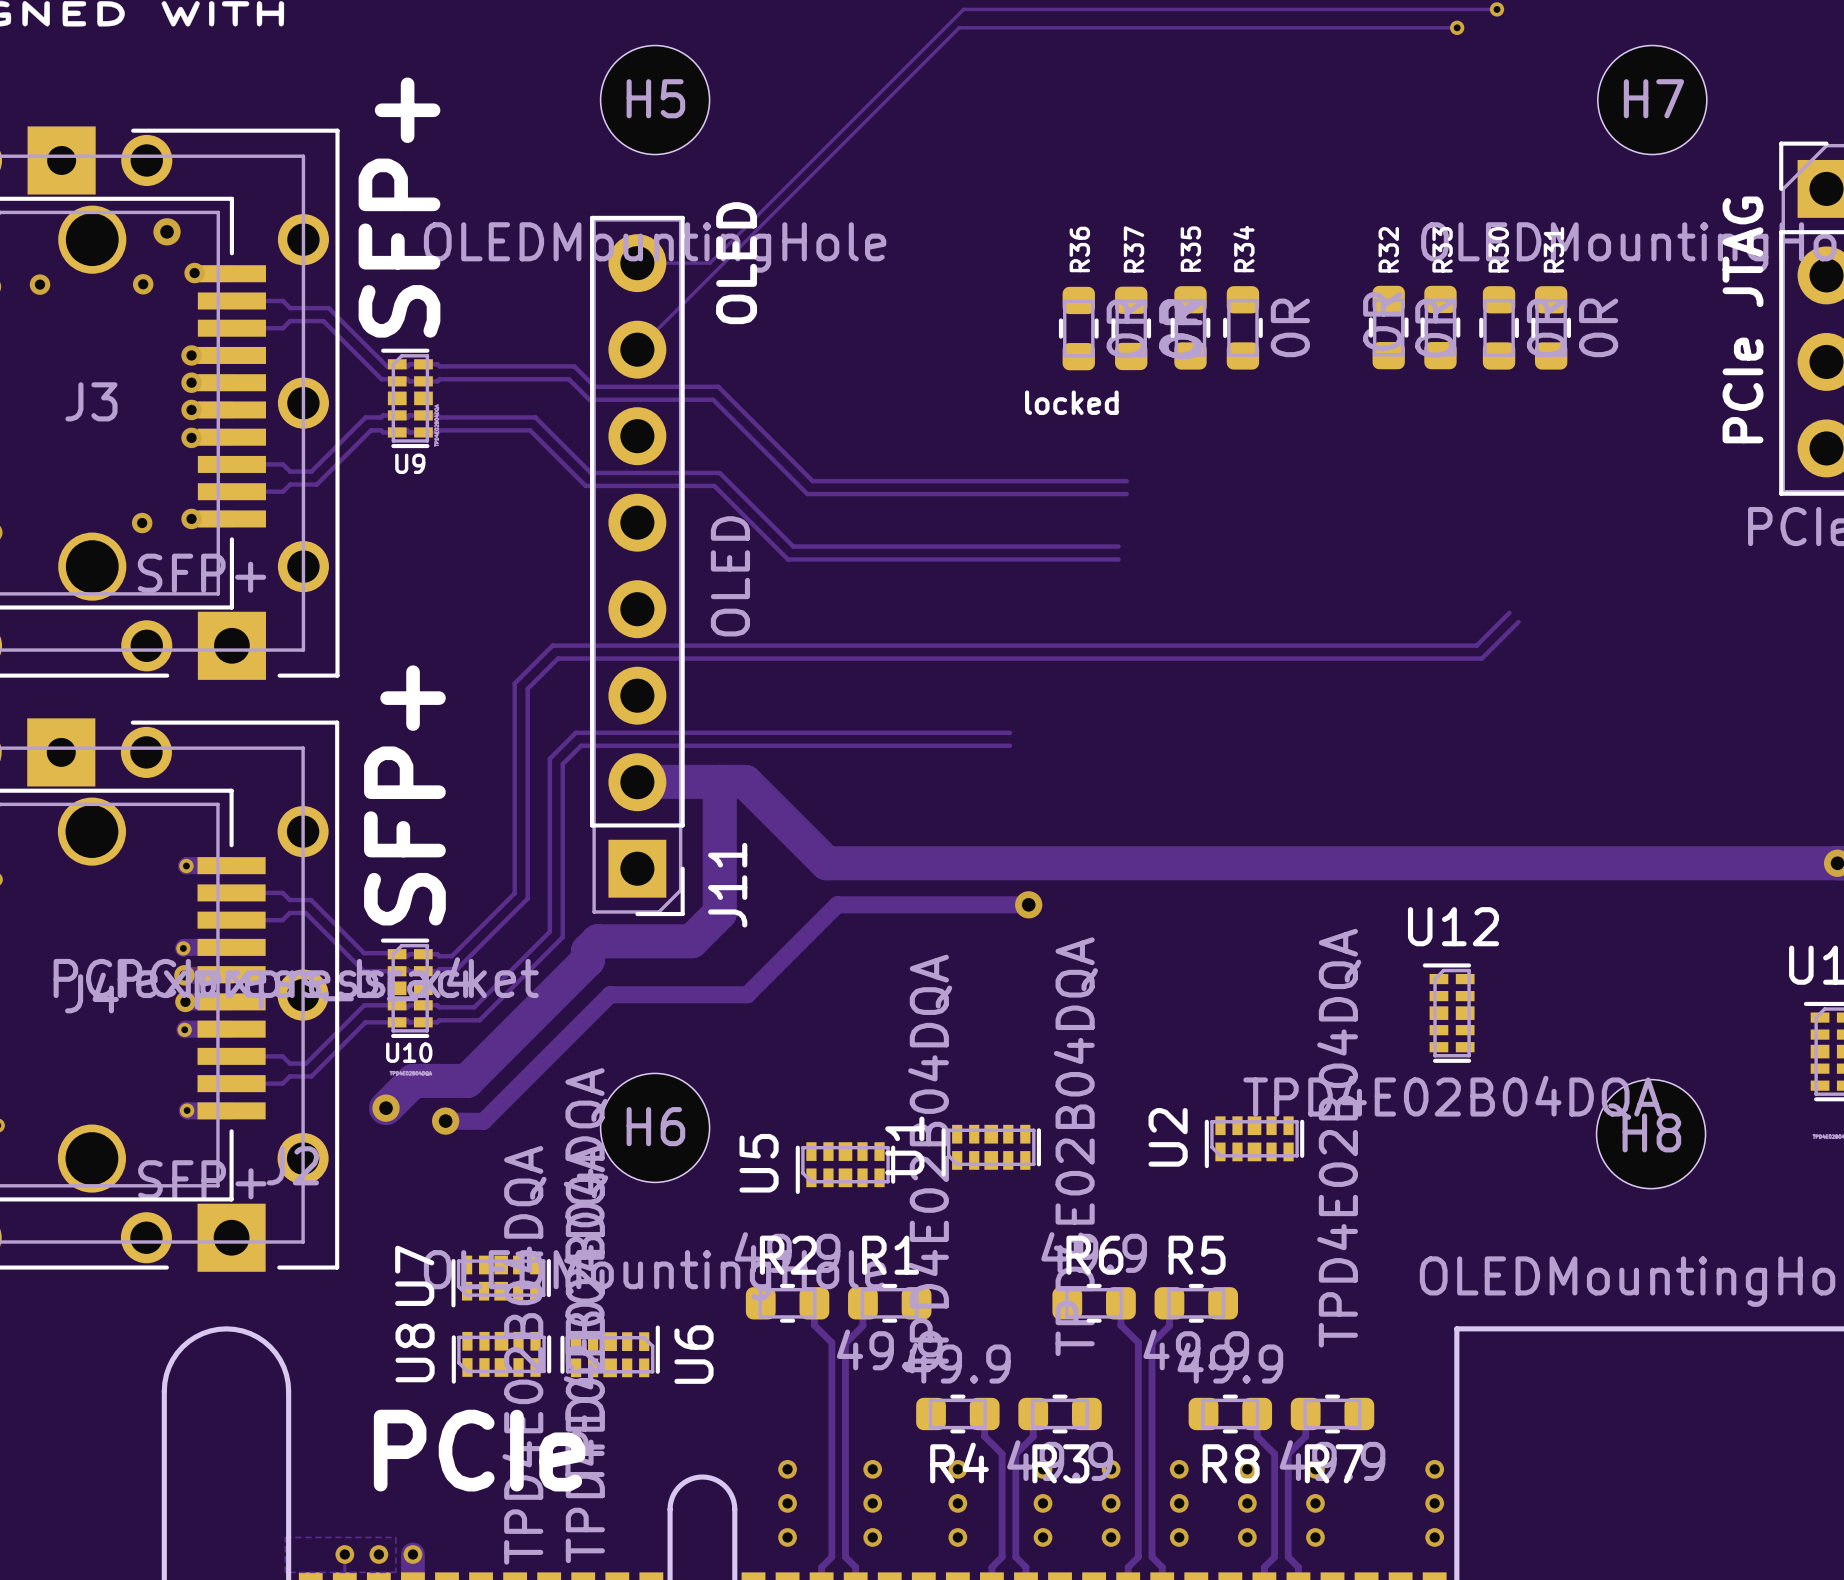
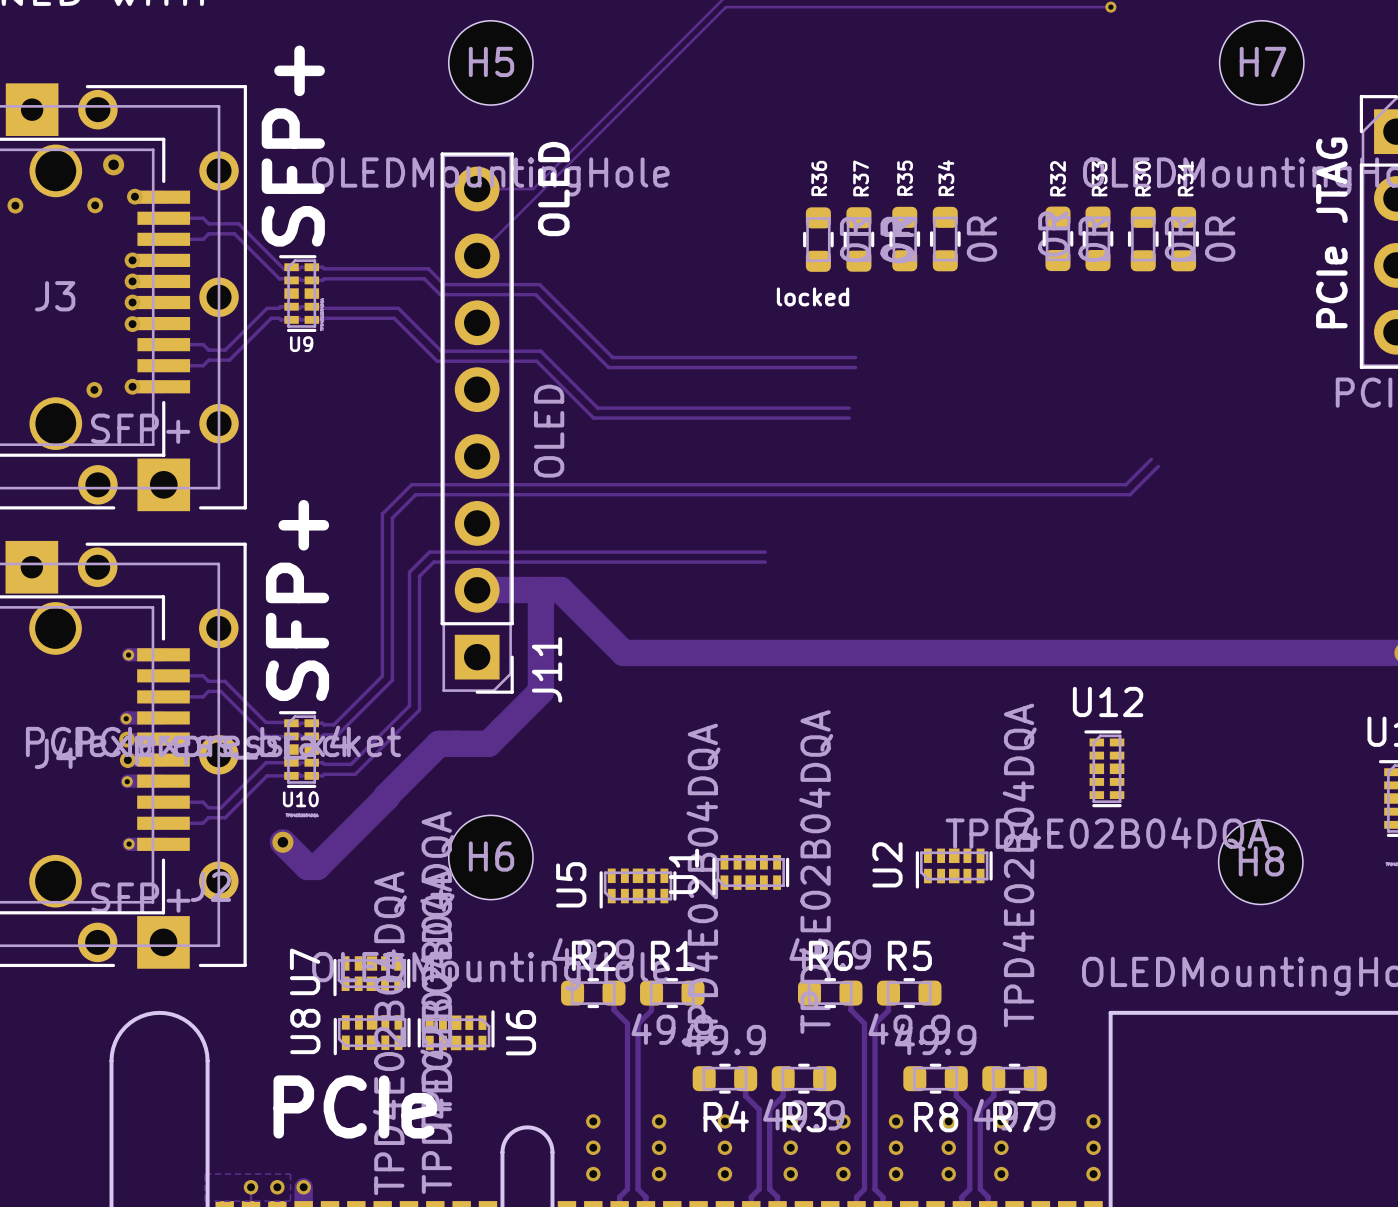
track: (1028, 904) (837, 904) (747, 994) (610, 994) (483, 1121) (445, 1121) -> none
via: (1028, 904) -> none
track: (691, 941) (597, 941) (588, 951) (588, 960) (467, 1080) (413, 1080) (386, 1108) -> (519, 713) (488, 743) (439, 743) (317, 866) (307, 866) (282, 842)
via: (445, 1121) -> none

